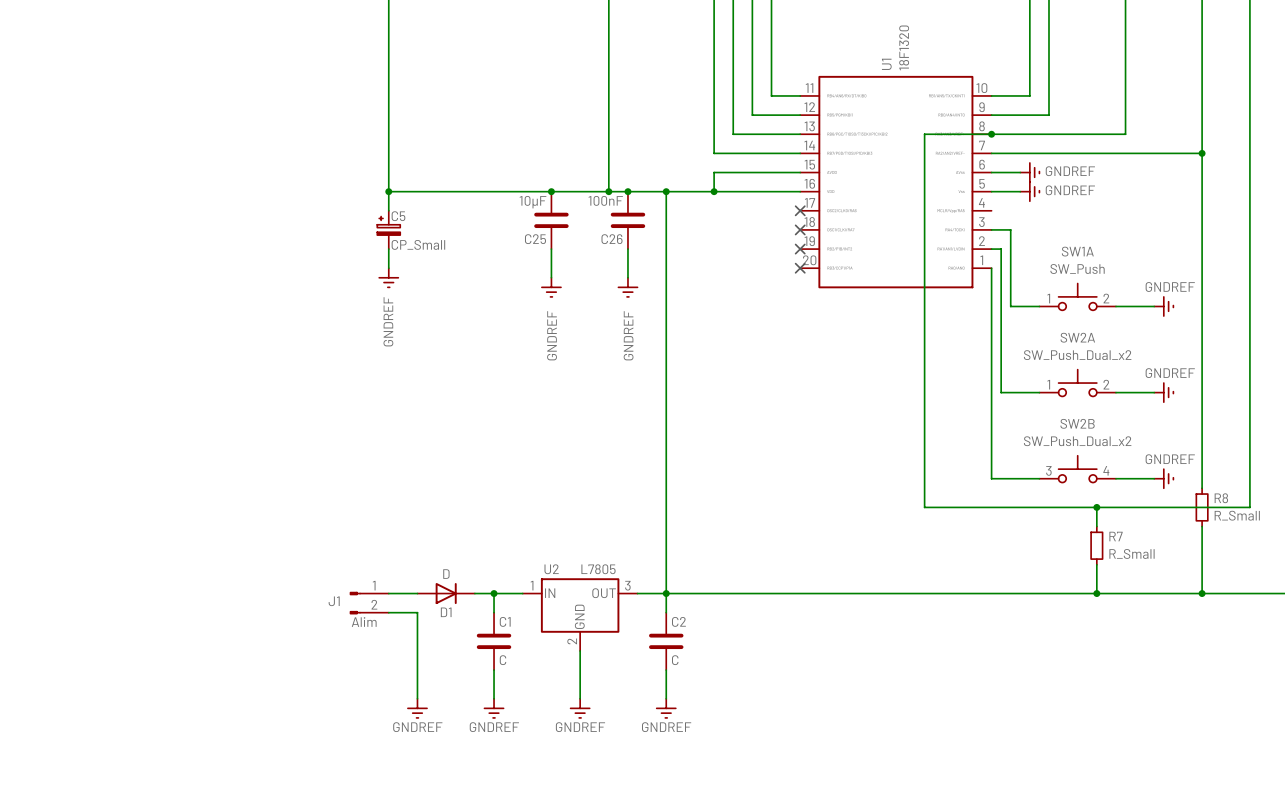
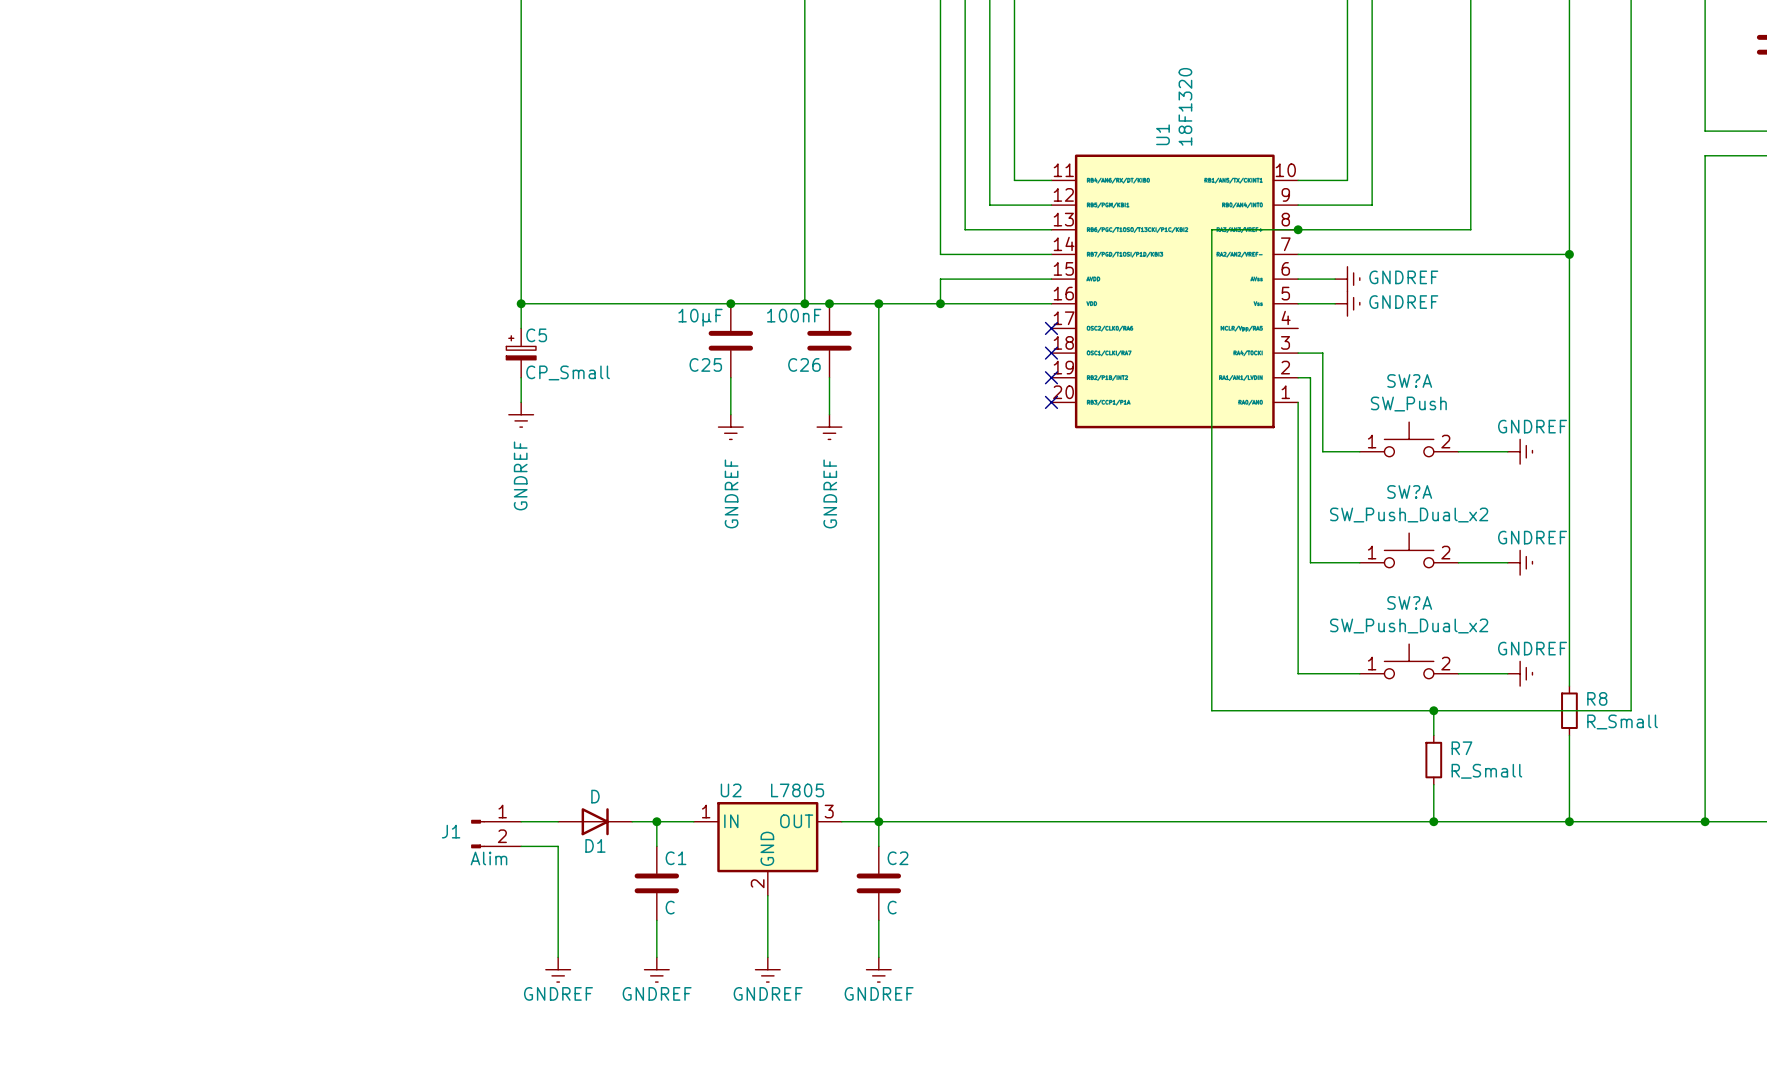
SW1A name: SW1A (1077, 251) -> SW?A (1409, 380)
SW2A name: SW2A (1077, 337) -> SW?A (1409, 491)
SW2B name: SW2B (1077, 423) -> SW?A (1409, 602)
SW2B pin number: 3 (1048, 470) -> 1 (1372, 663)
SW2B pin number: 4 (1106, 470) -> 2 (1445, 663)

